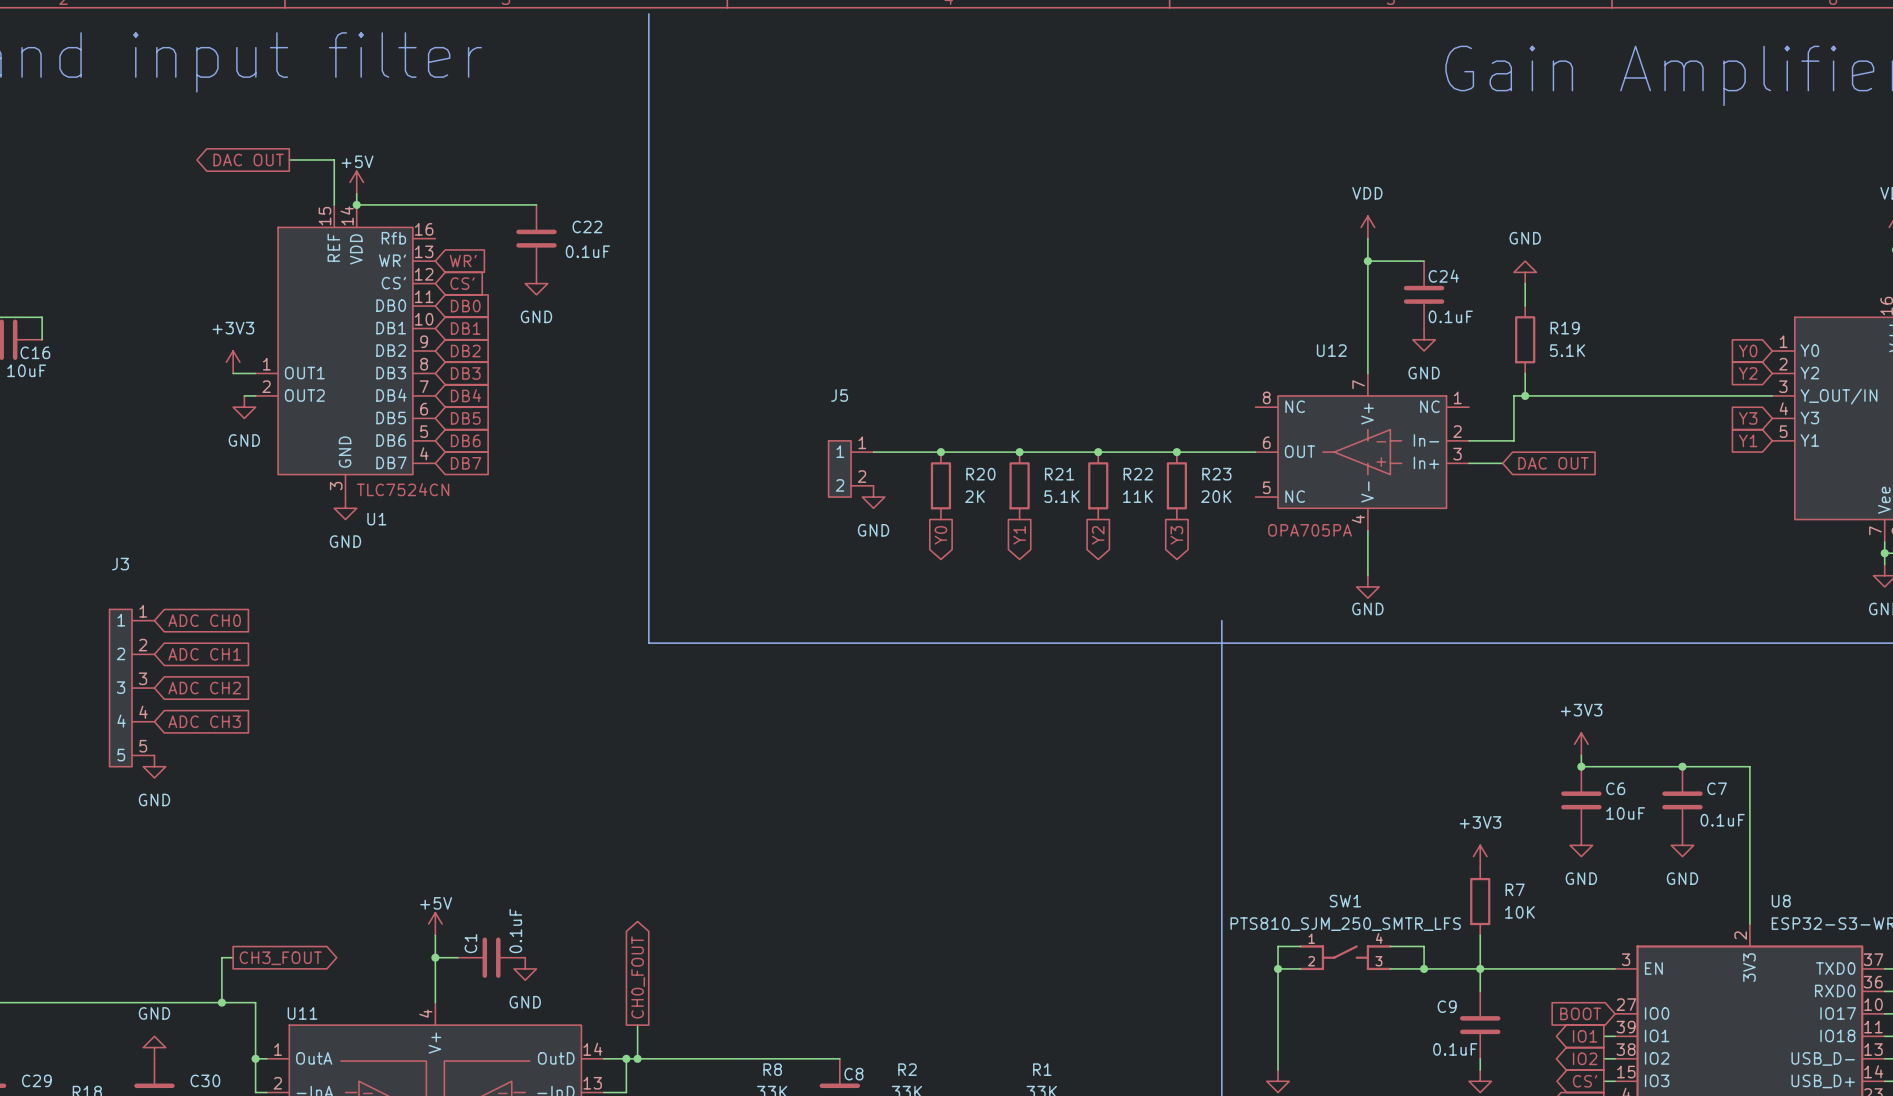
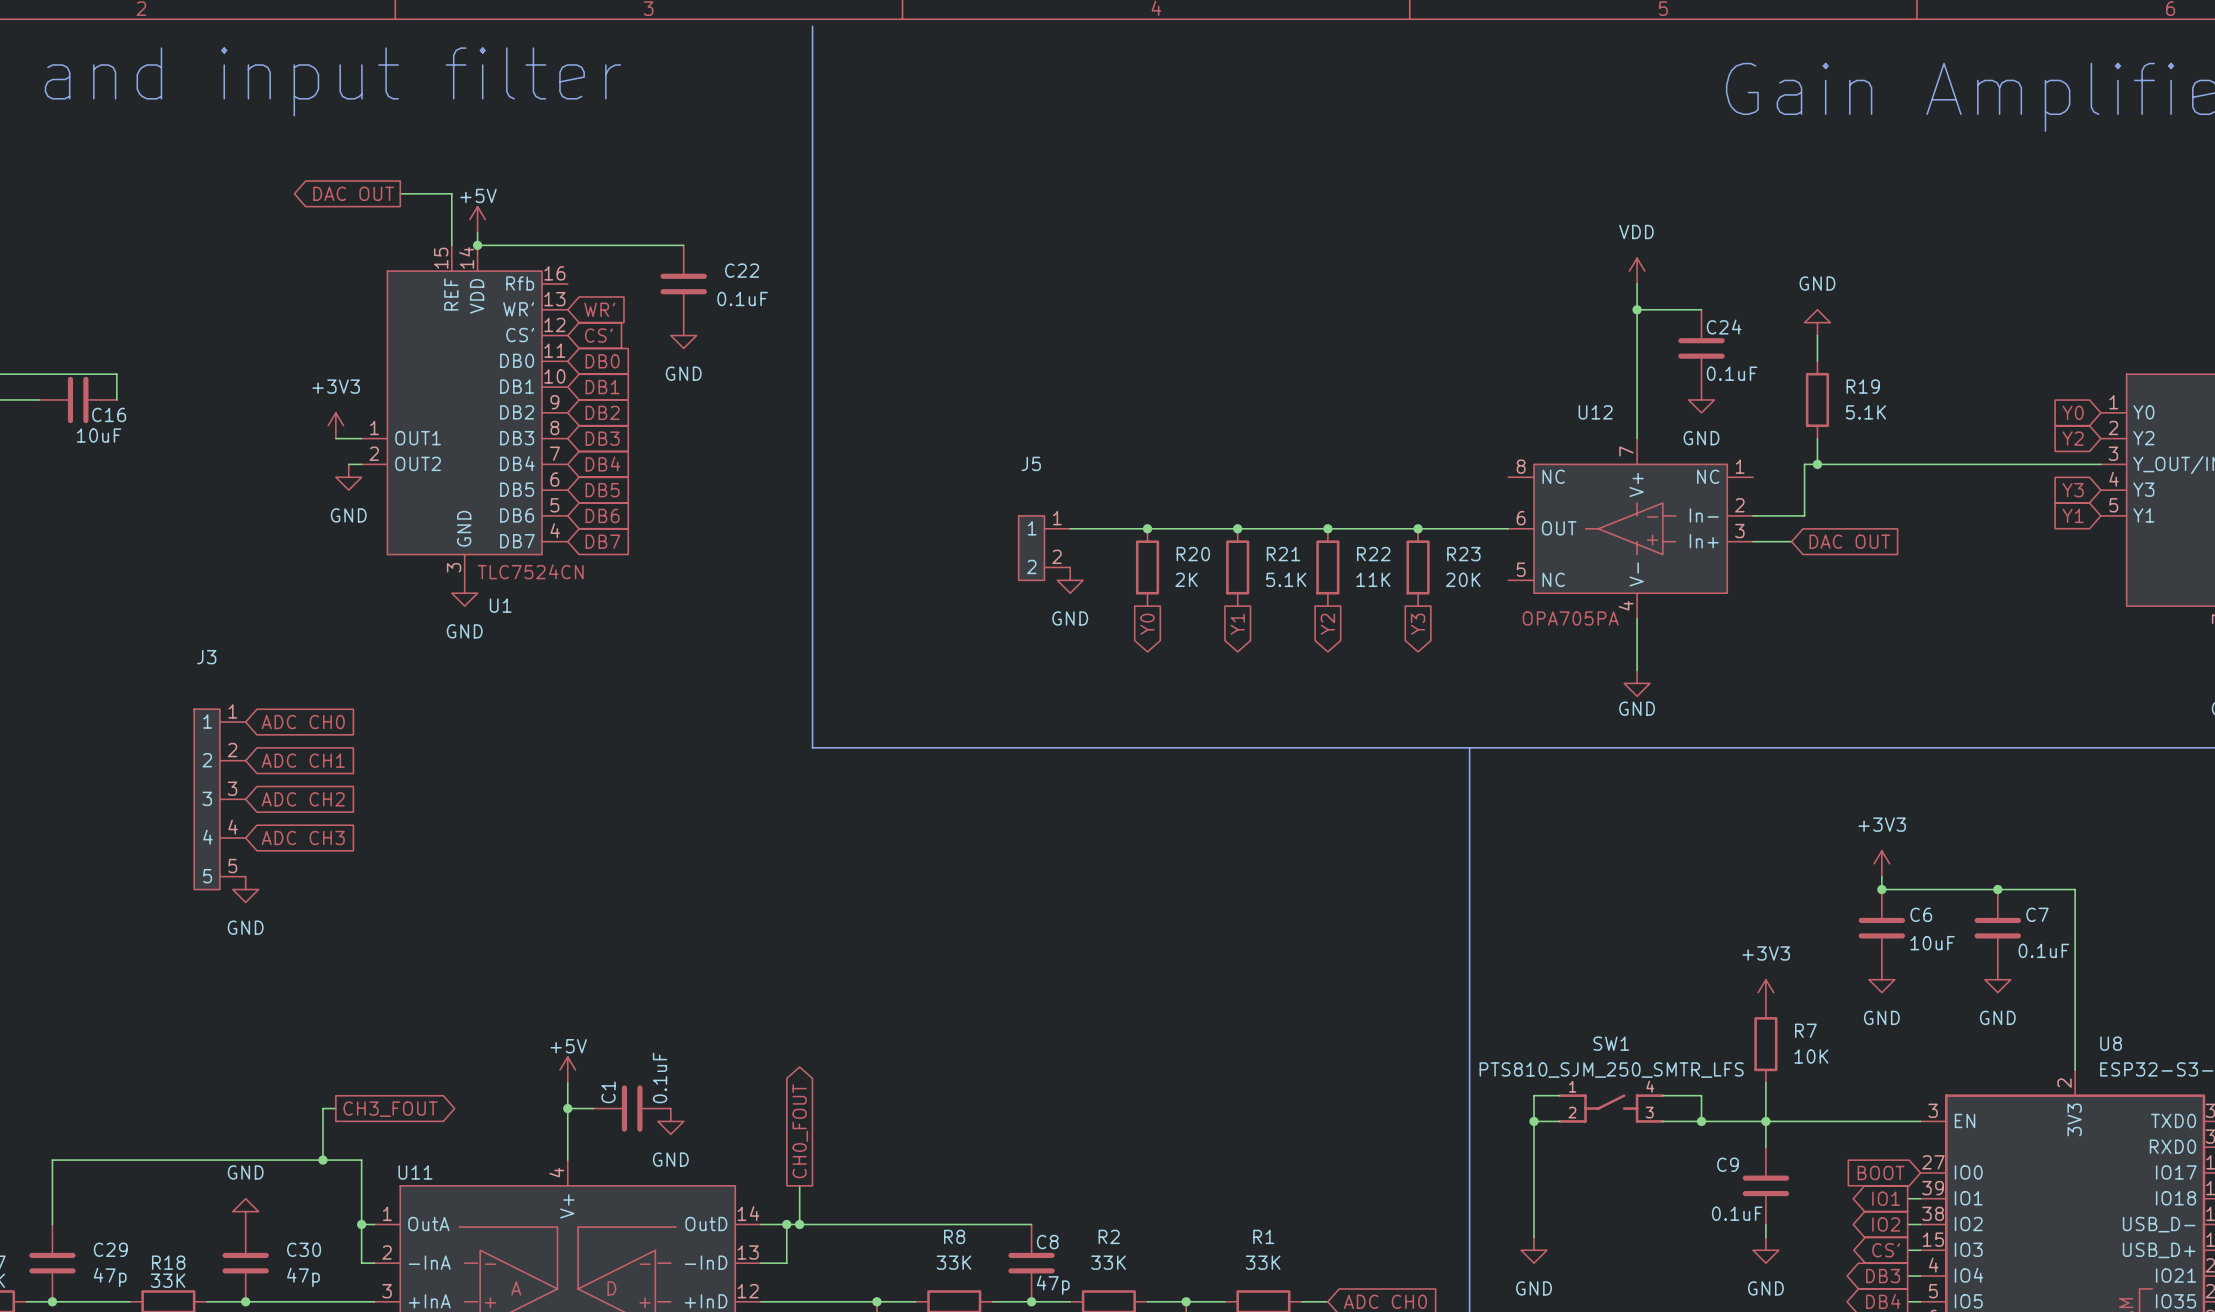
line: (1221, 620) (1221, 643) -> none

